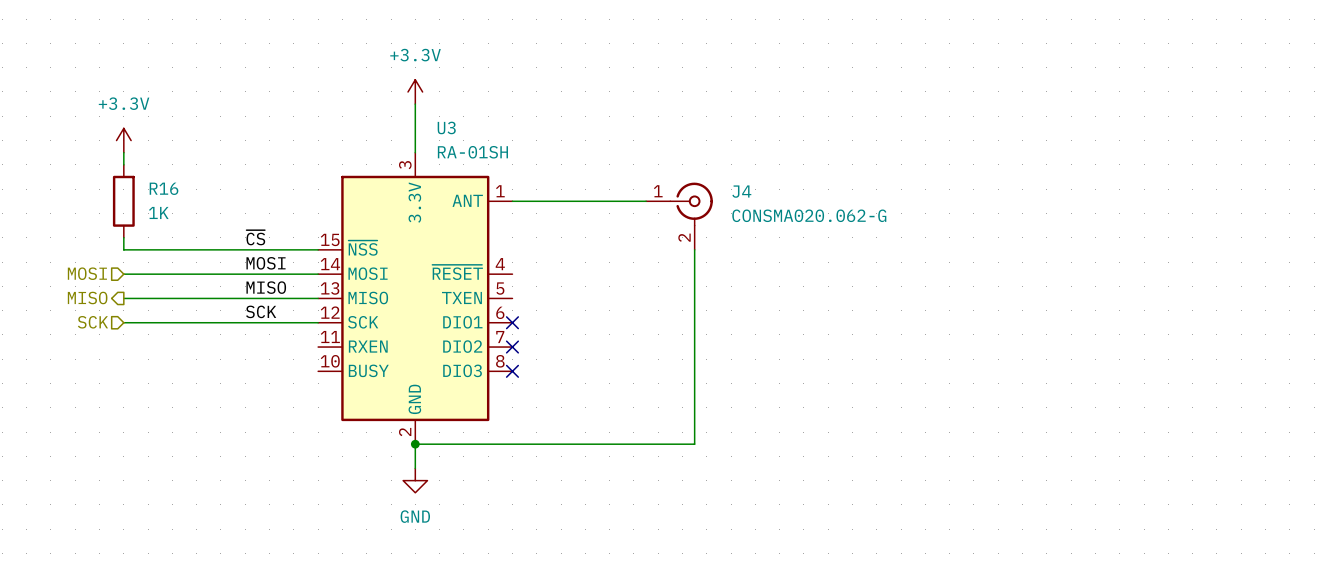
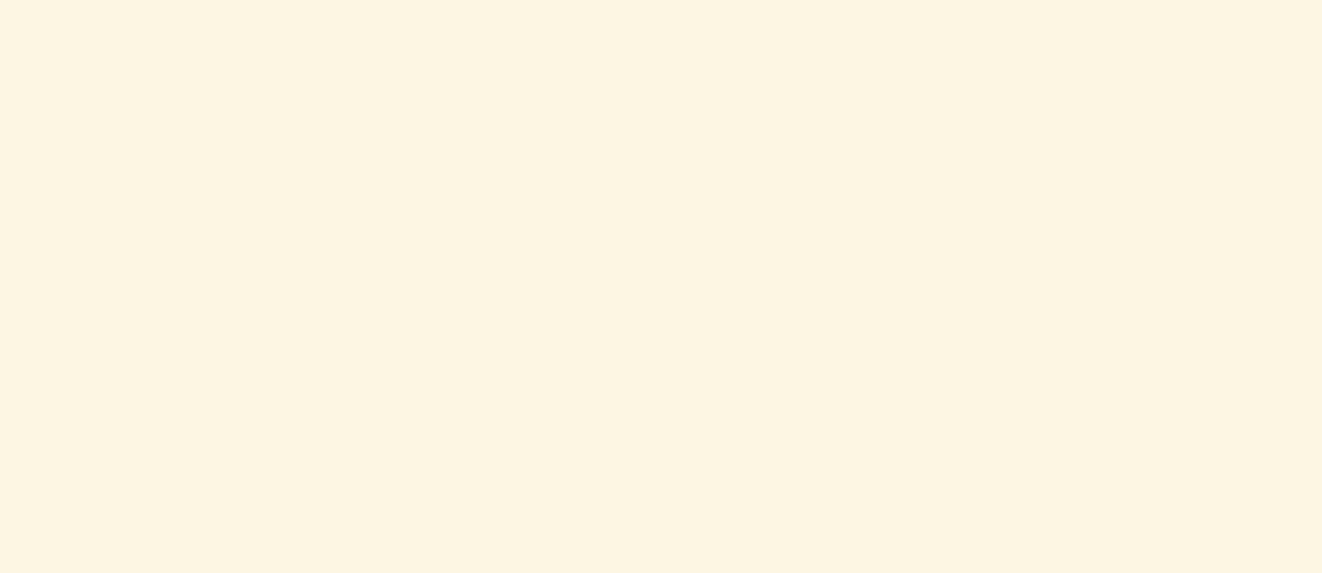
power symbol: +3.3V (415, 91) -> none
wire: (415, 104) (415, 152) -> none
power symbol: +3.3V (123, 140) -> none
wire: (123, 152) (123, 164) -> none
R16: 1K (123, 201) -> none
wire: (512, 201) (646, 201) -> none
J4: CONSMA020.062-G (679, 216) -> none
wire: (123, 237) (123, 249) (318, 249) -> none
label: ~{CS} (255, 237) -> none
wire: (694, 249) (694, 444) (415, 444) (415, 468) -> none
label: MOSI (266, 263) -> none
hierarchical label: MOSI (87, 273) -> none
wire: (123, 274) (318, 274) -> none
label: MISO (266, 287) -> none
hierarchical label: MISO (87, 297) -> none
wire: (123, 298) (318, 298) -> none
U3: RA-01SH (415, 298) -> none
label: SCK (261, 311) -> none
hierarchical label: SCK (92, 322) -> none
wire: (123, 322) (318, 322) -> none
no-connect mark: (512, 322) -> none
no-connect mark: (512, 347) -> none
no-connect mark: (512, 371) -> none
junction: (415, 444) -> none
power symbol: GND (415, 480) -> none

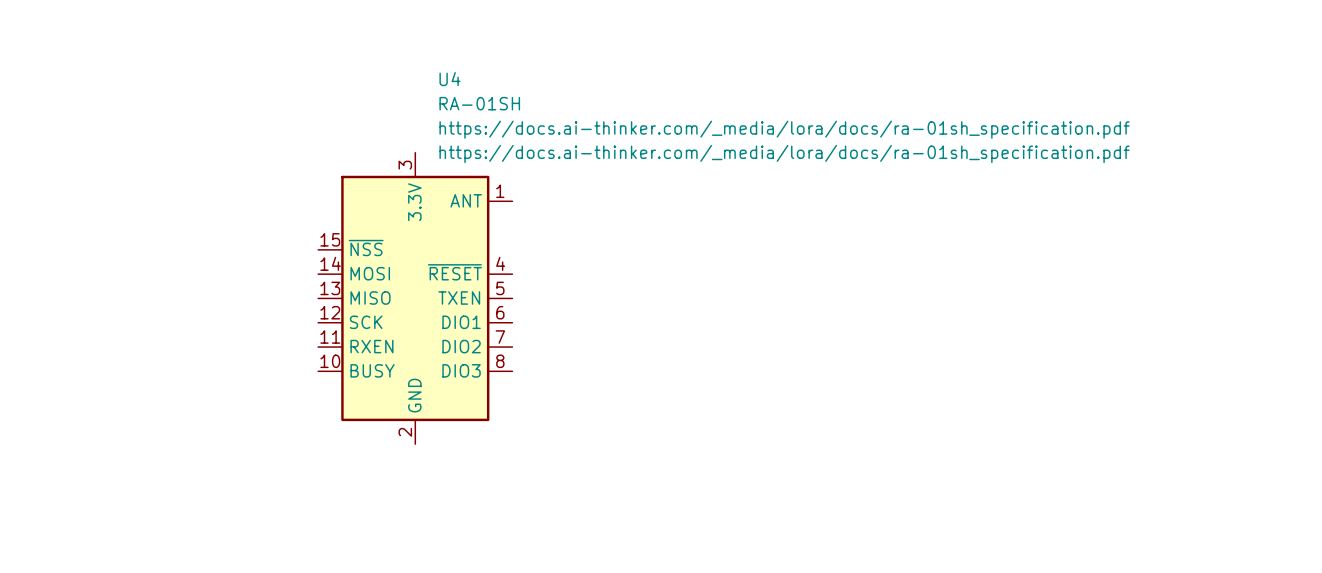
U4: none -> RA-01SH (415, 298)

